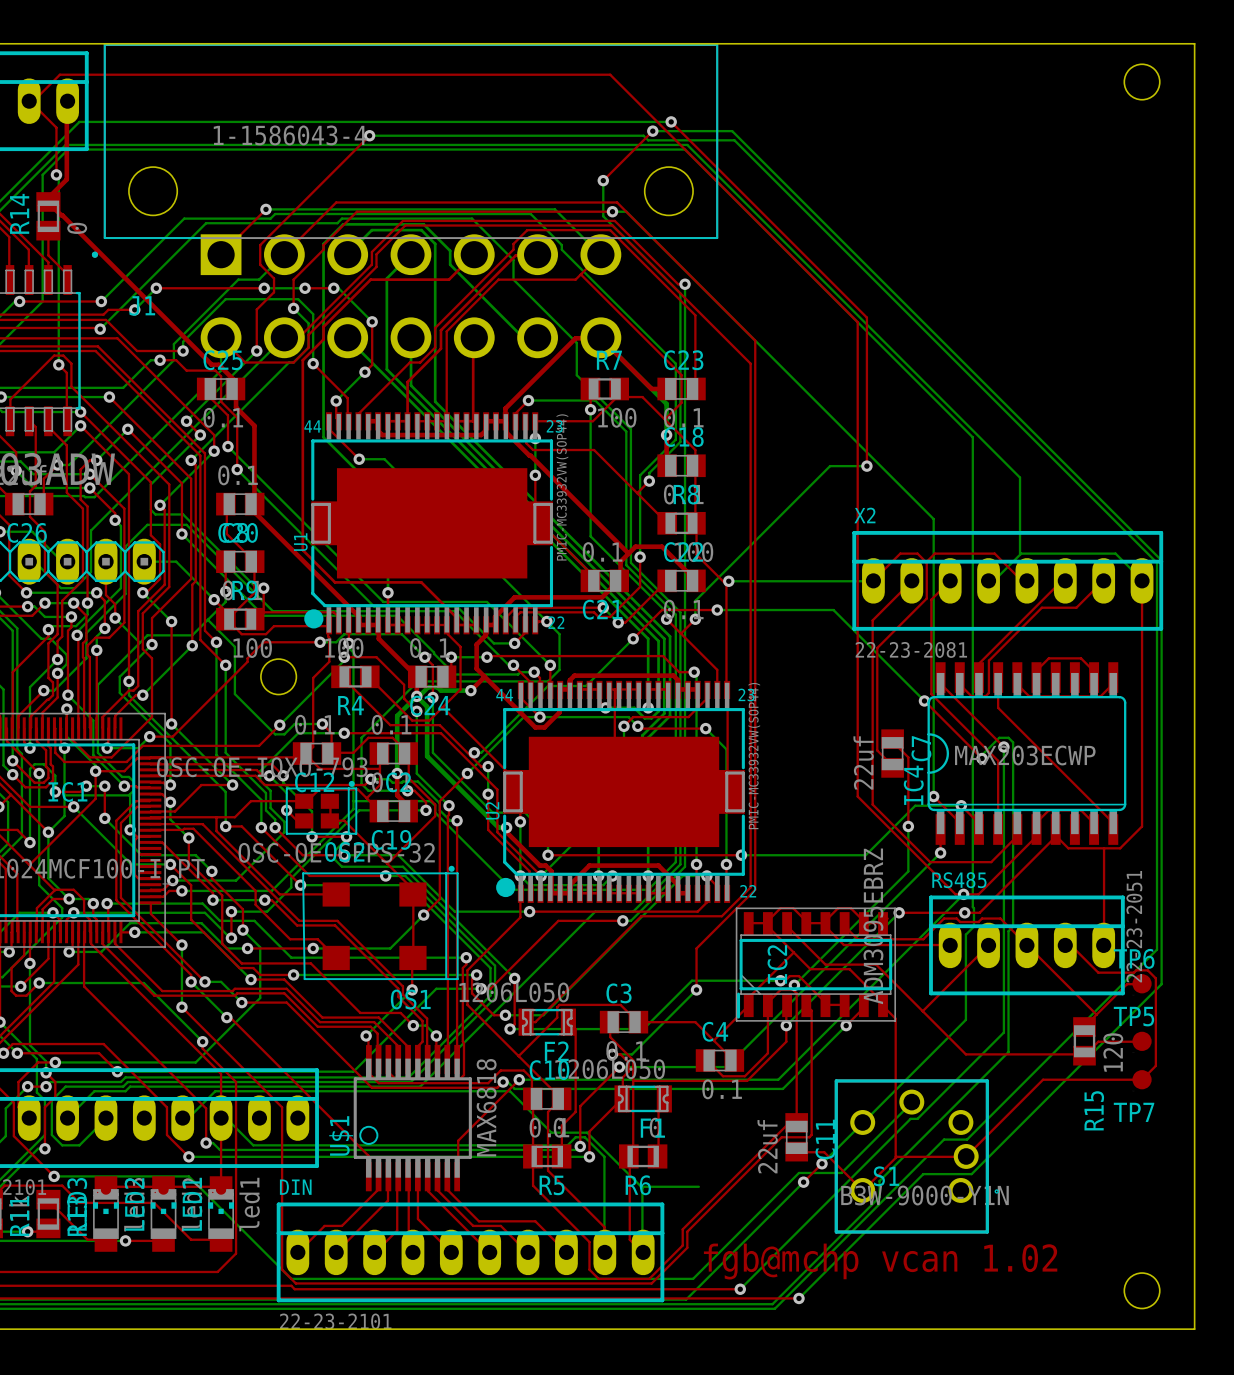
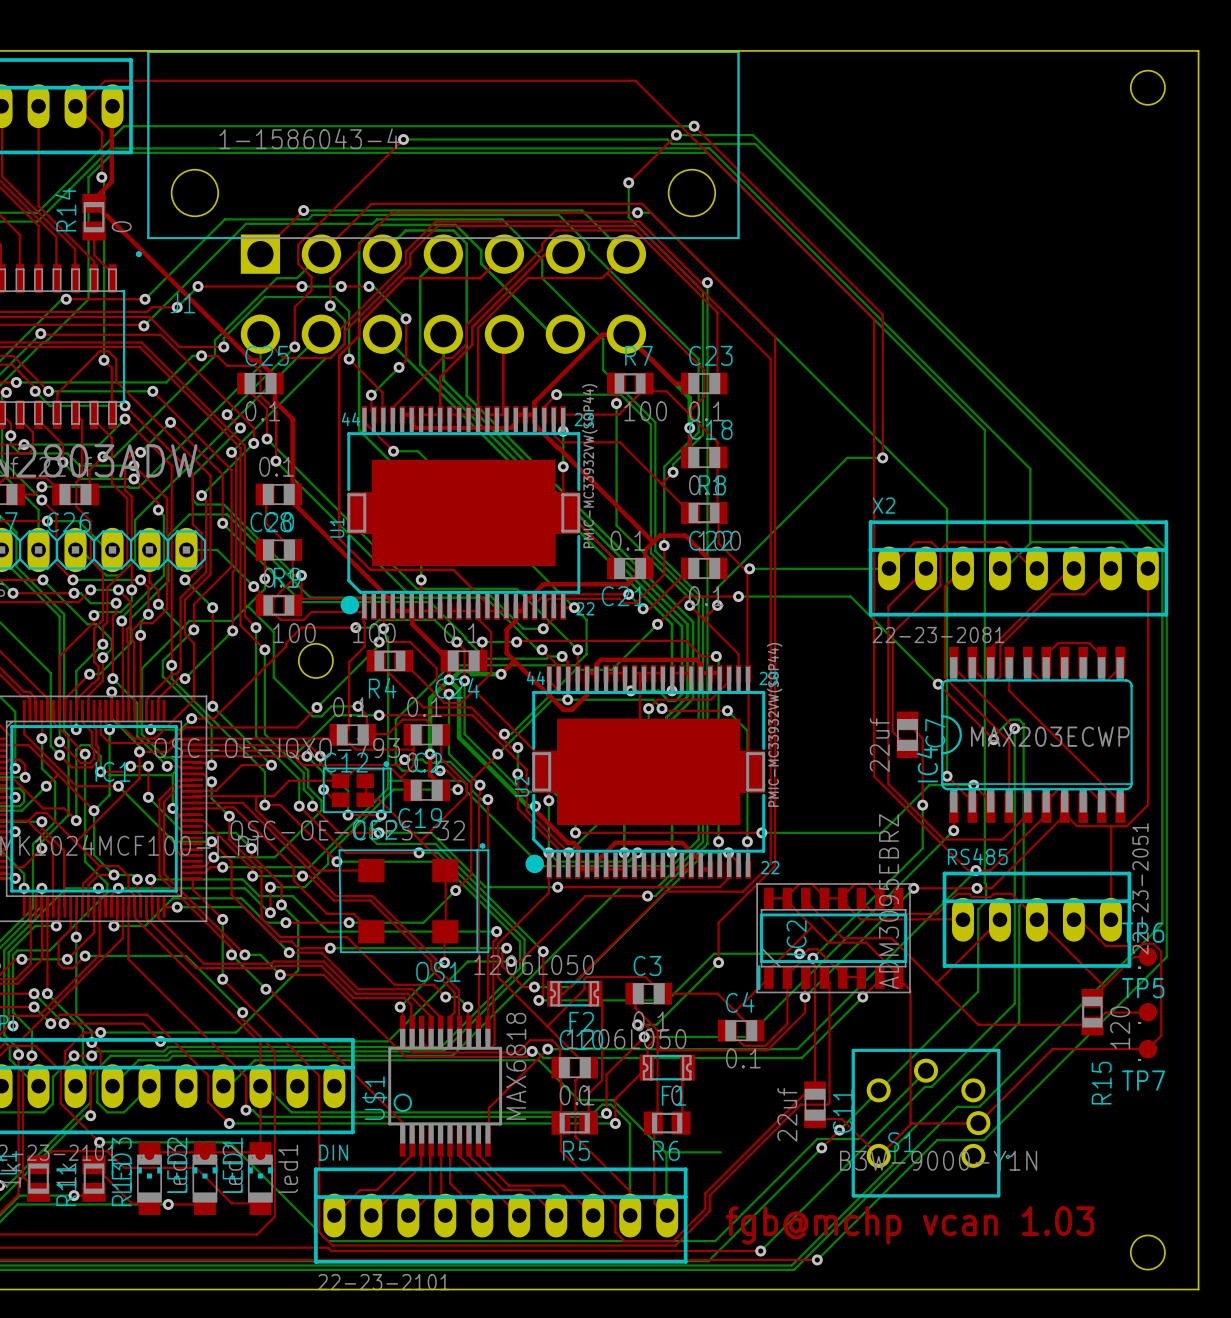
text: fgb@mchp vcan 1.02 (880, 1261) -> fgb@mchp vcan 1.03 (909, 1225)

